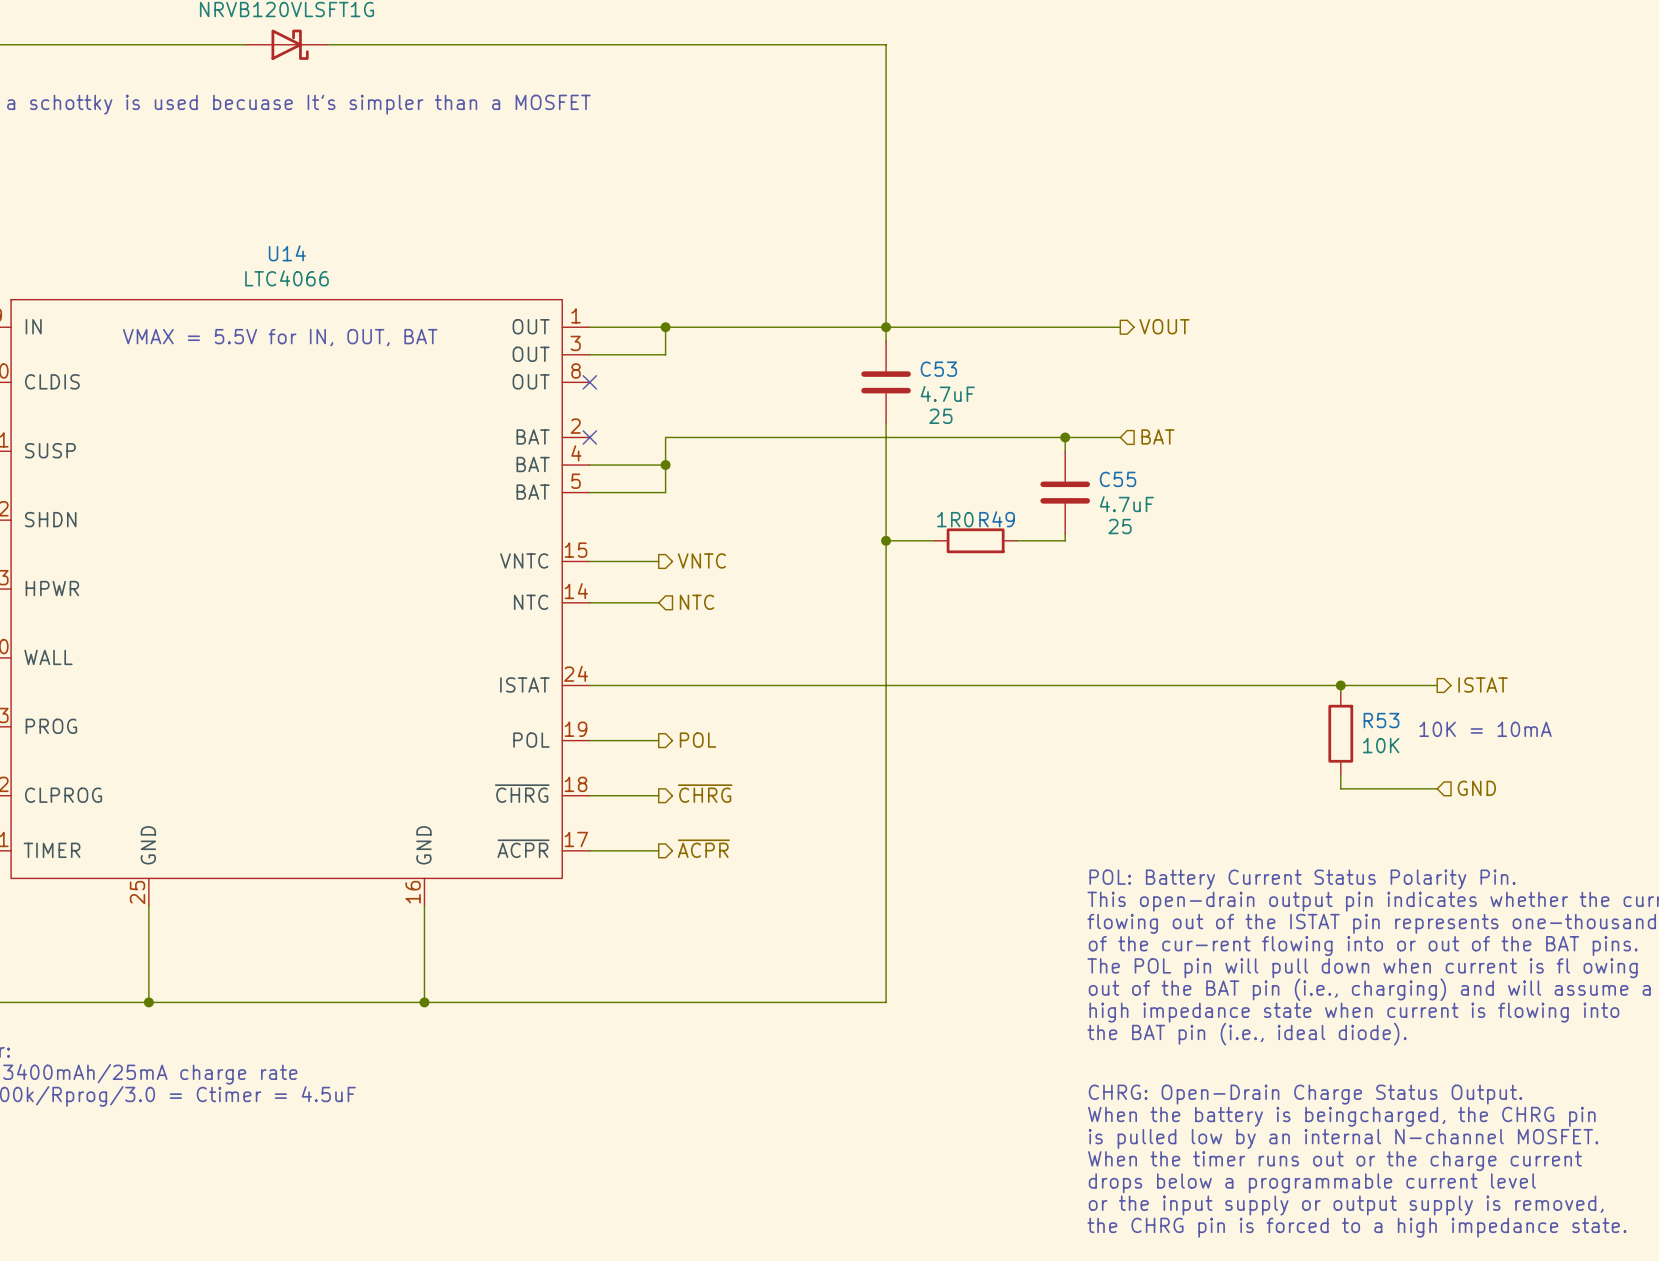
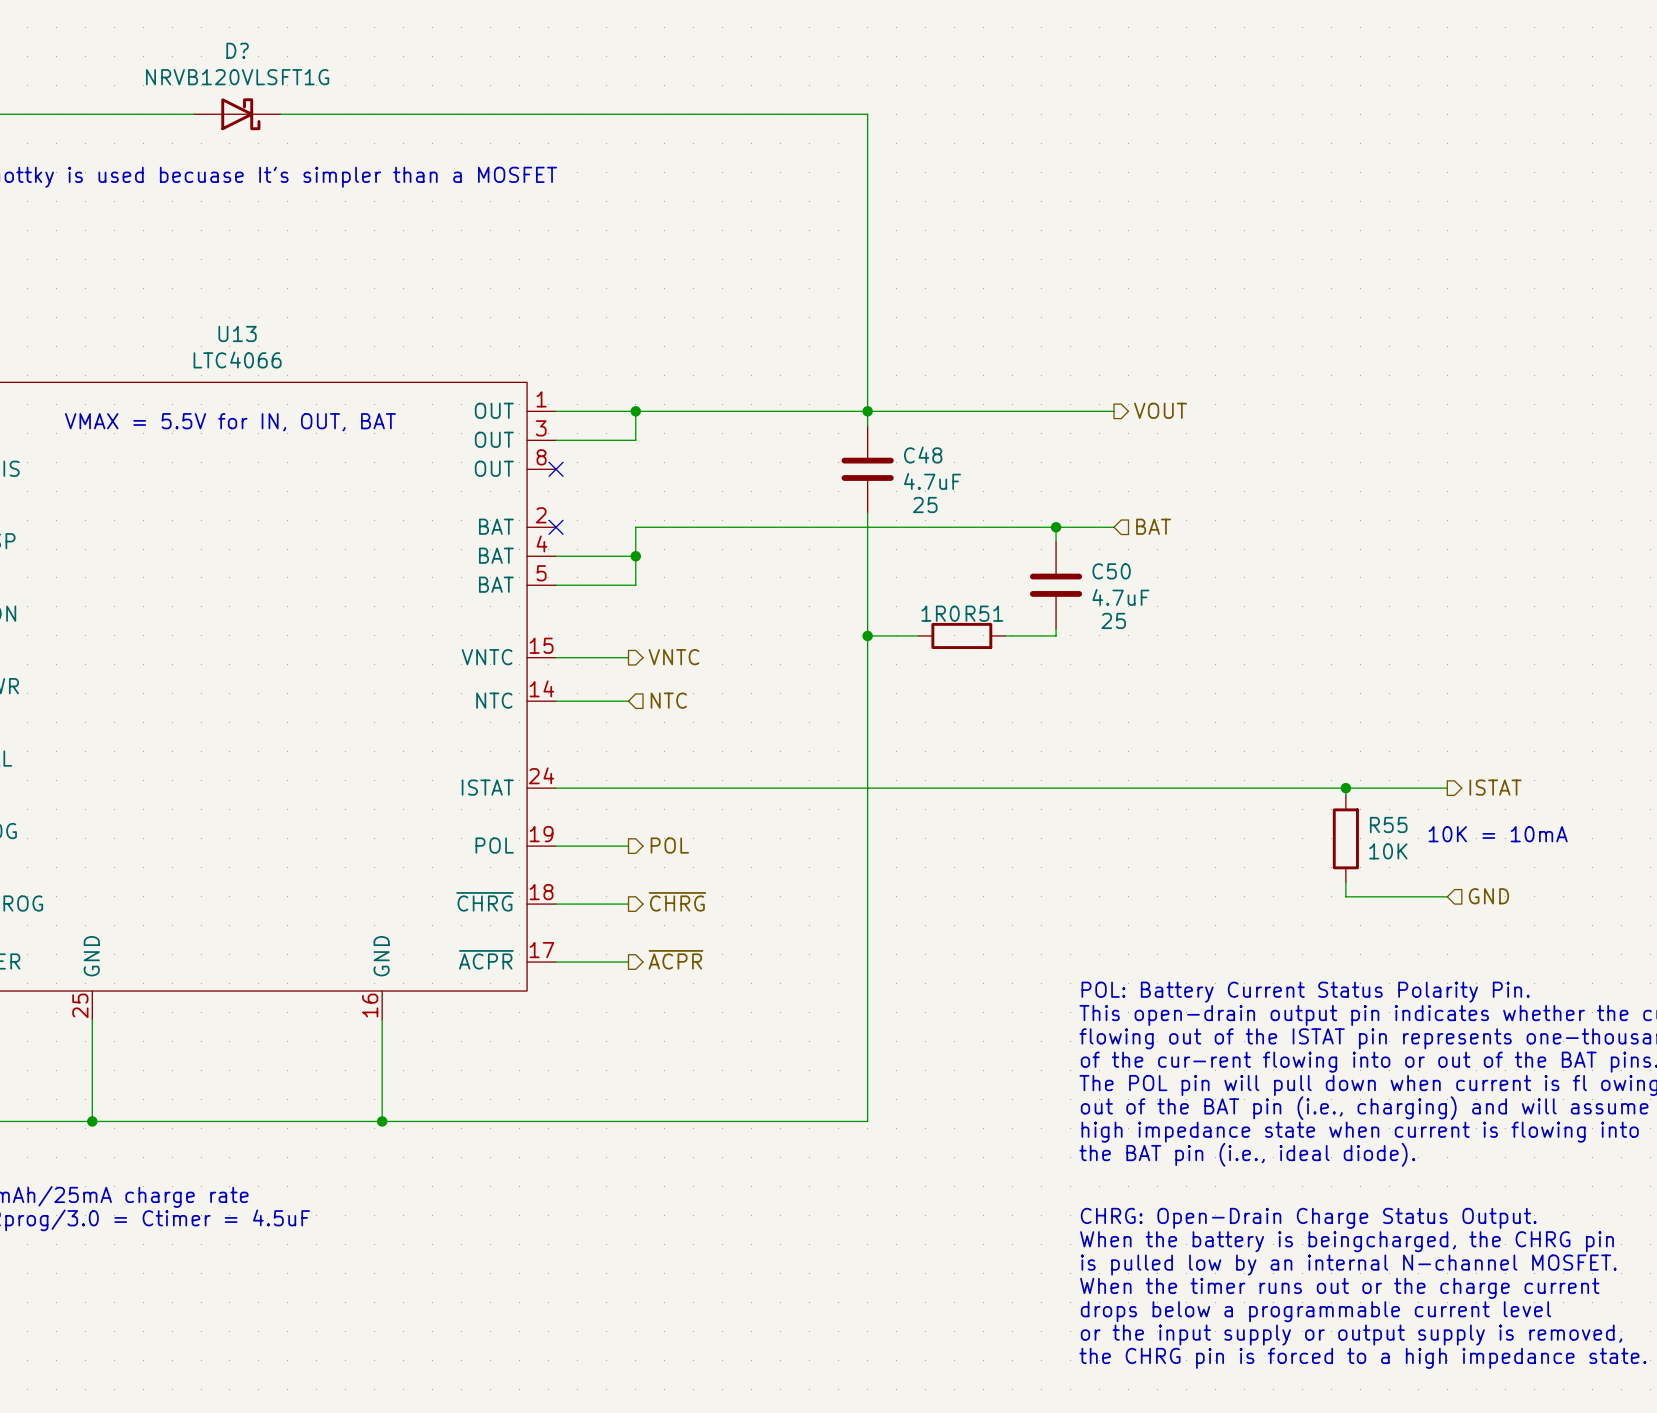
U14 name: U14 (287, 253) -> U13 (237, 333)
C53 name: C53 (938, 369) -> C48 (923, 455)
C55 name: C55 (1117, 479) -> C50 (1111, 571)
R49 name: R49 (997, 519) -> R51 (984, 613)
R53 name: R53 (1381, 720) -> R55 (1388, 824)

